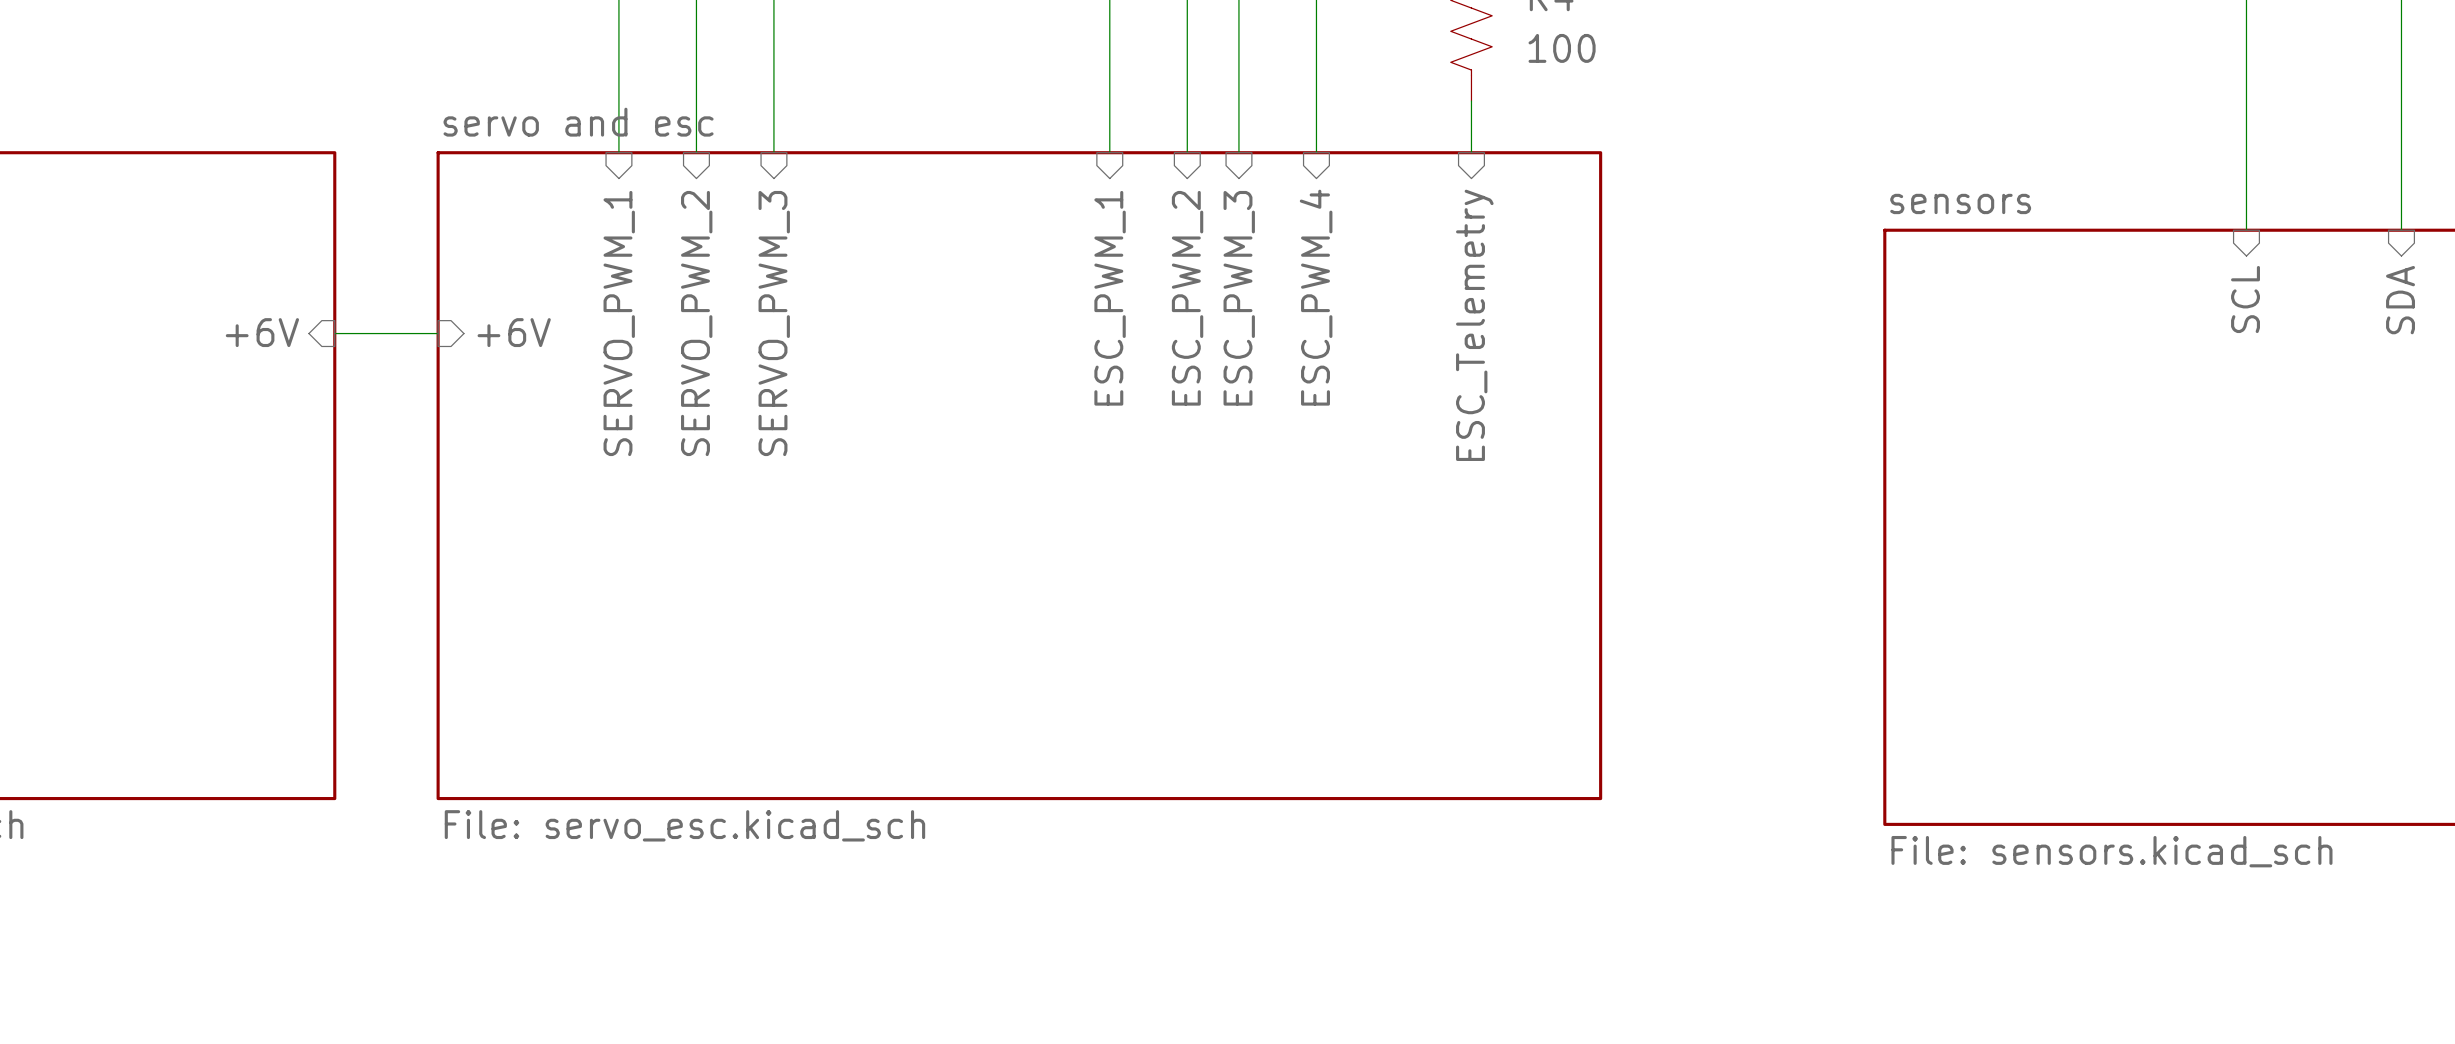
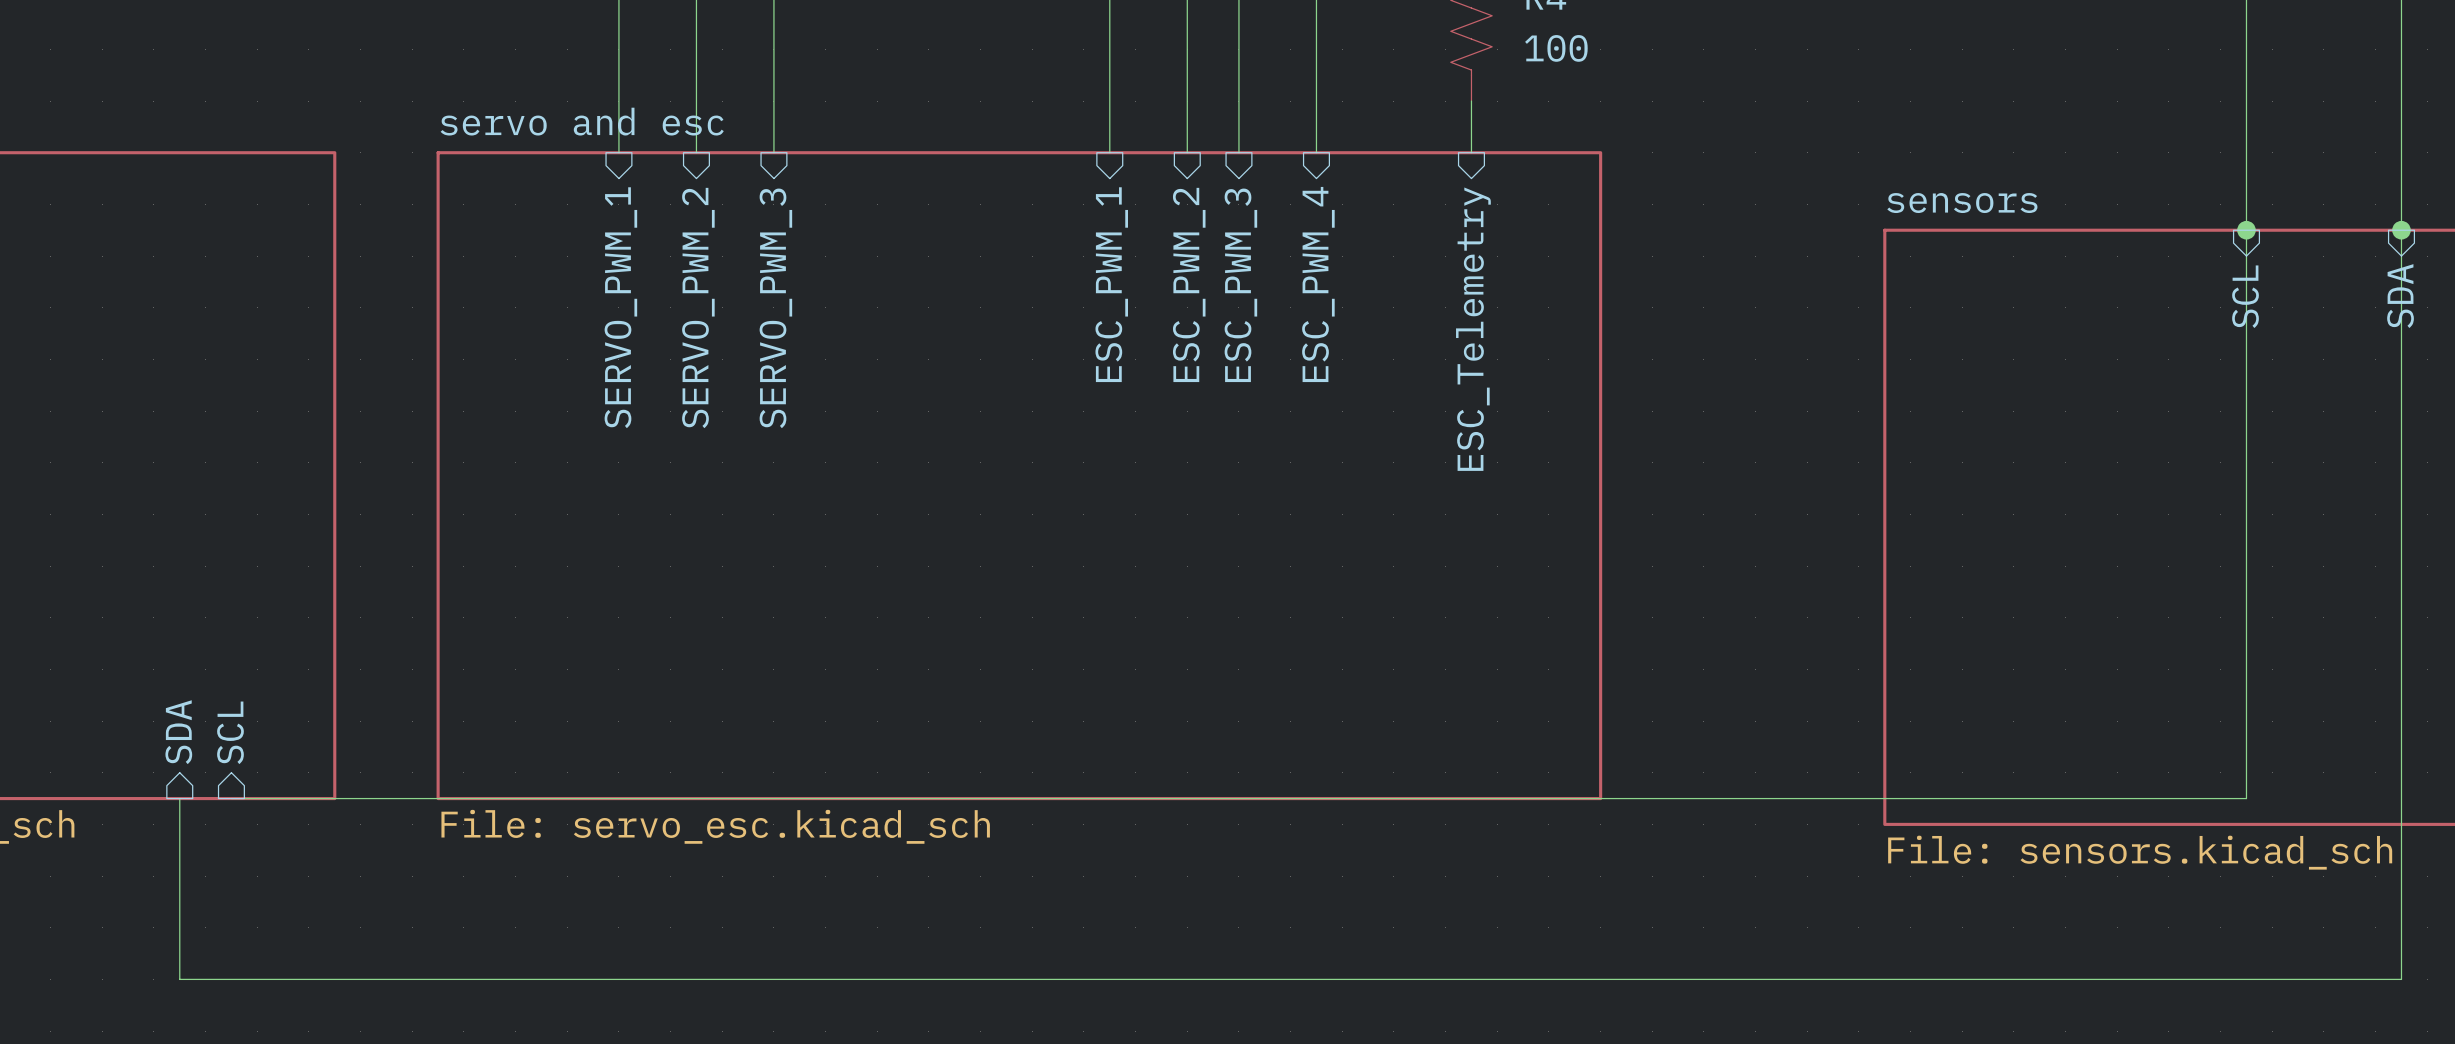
wire: none -> (2246, 230) (2246, 798) (231, 798)
junction: none -> (2246, 230)
wire: none -> (2401, 230) (2401, 979) (179, 979) (179, 798)
junction: none -> (2401, 230)
sheet pin: +6V (262, 332) -> none
sheet pin: +6V (514, 332) -> none
wire: (334, 333) (438, 333) -> none
sheet pin: none -> SDA (178, 732)
sheet pin: none -> SCL (230, 732)

